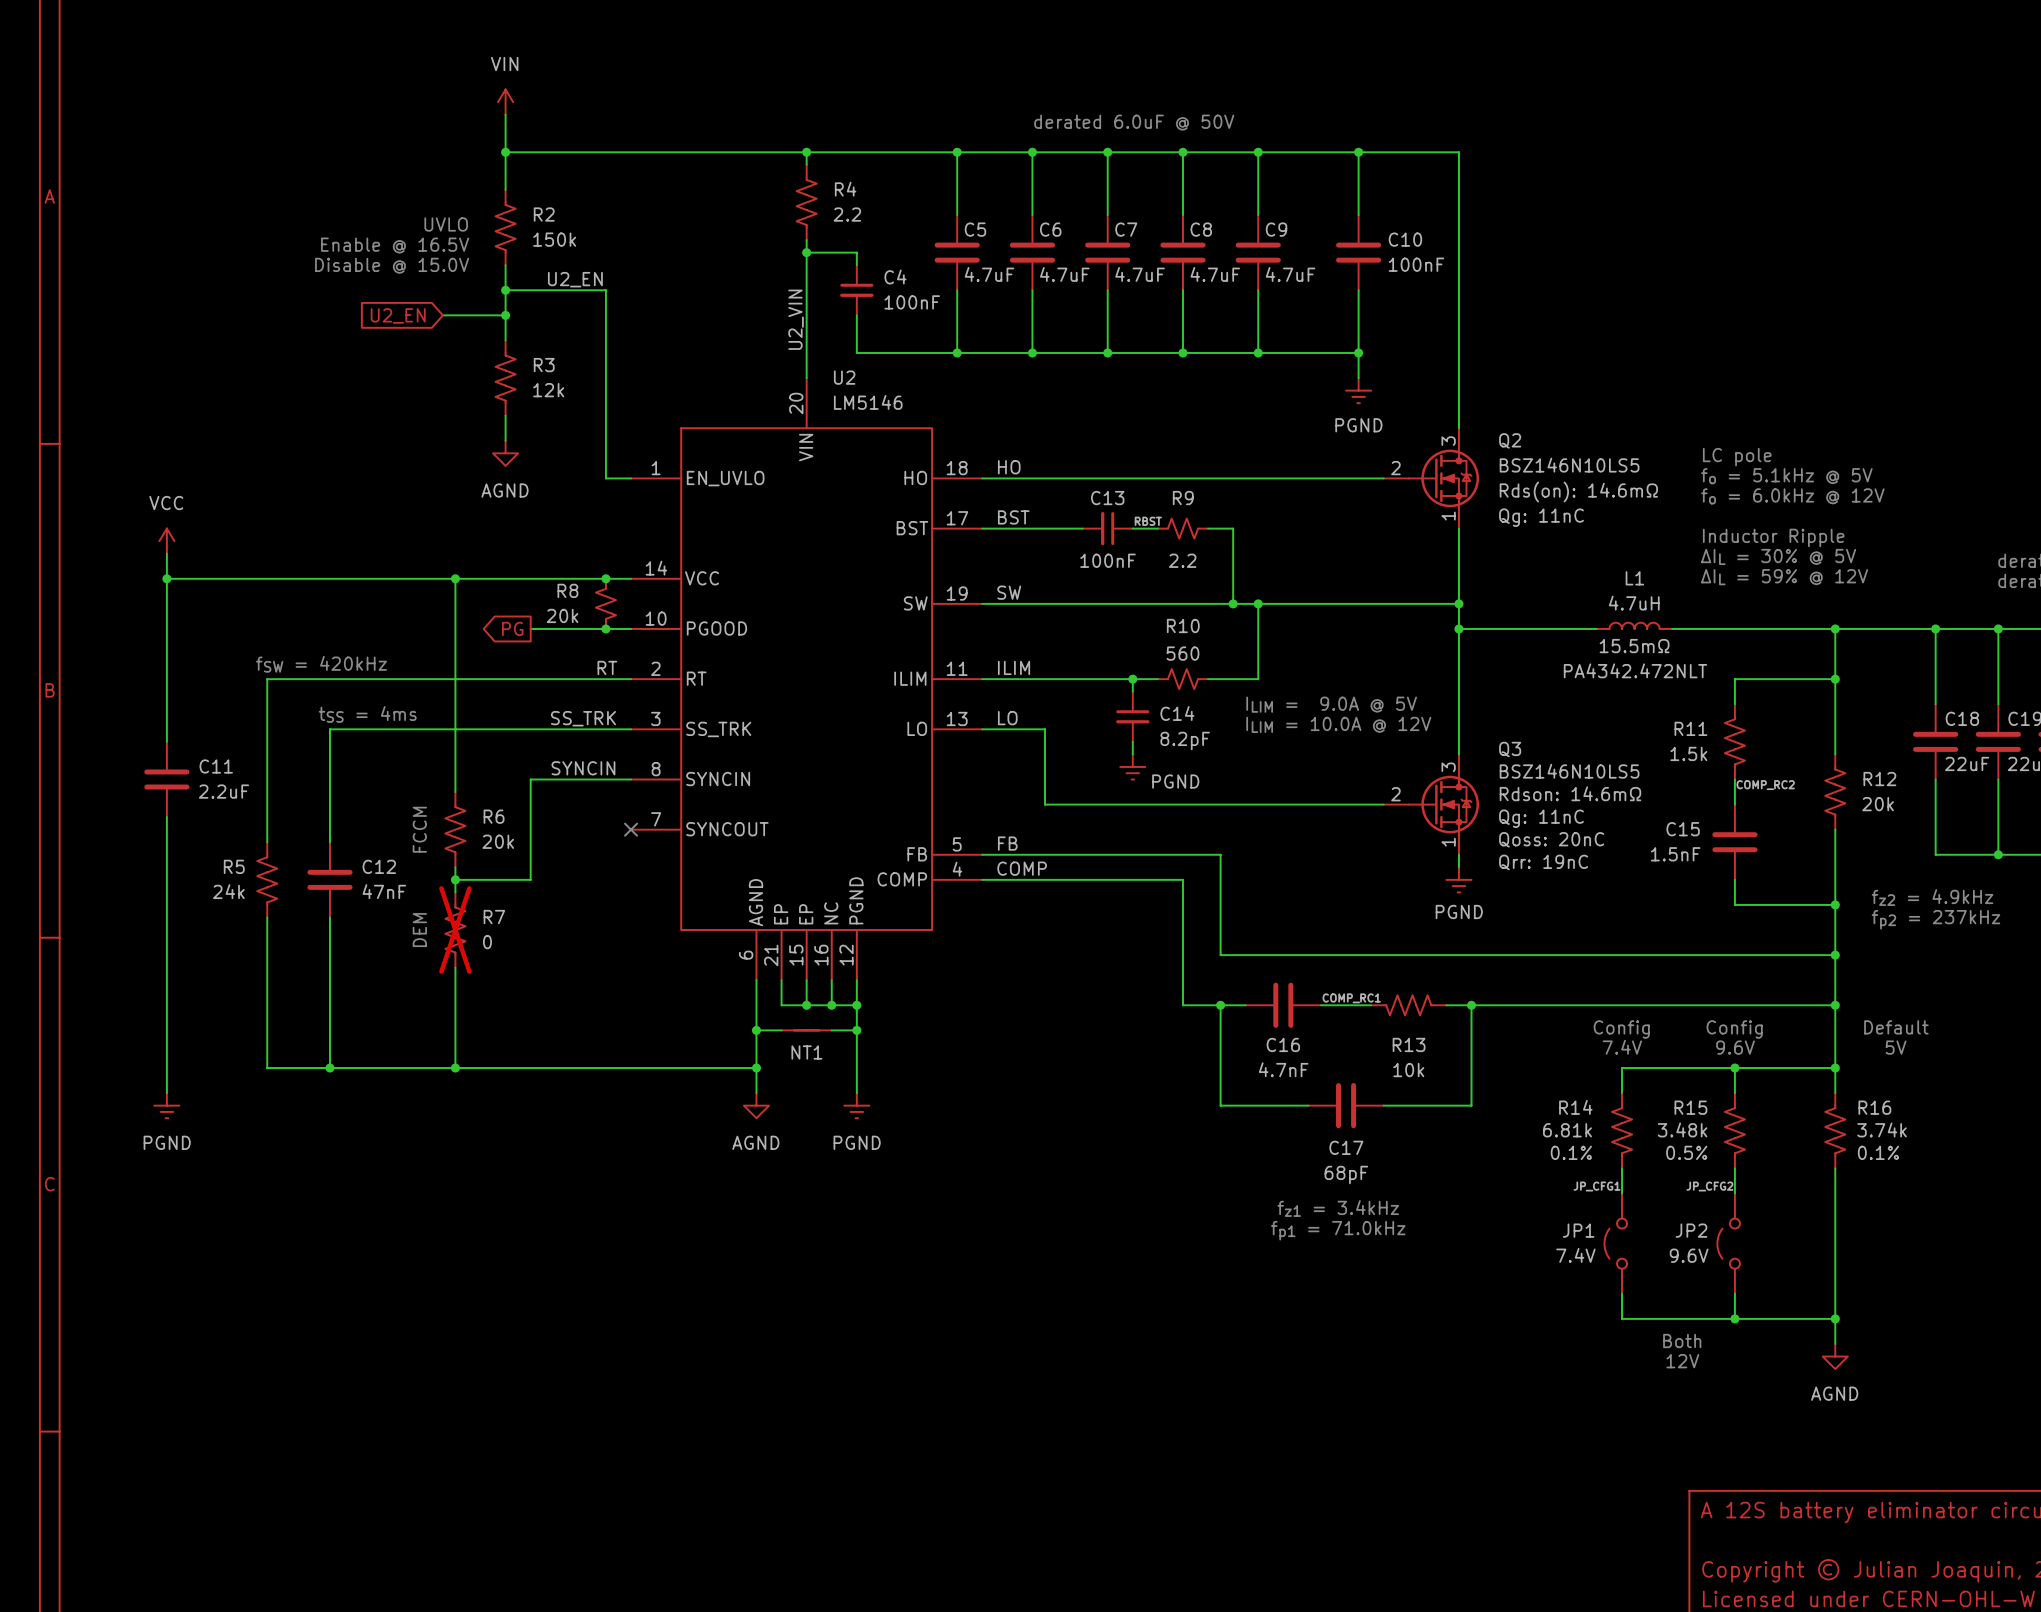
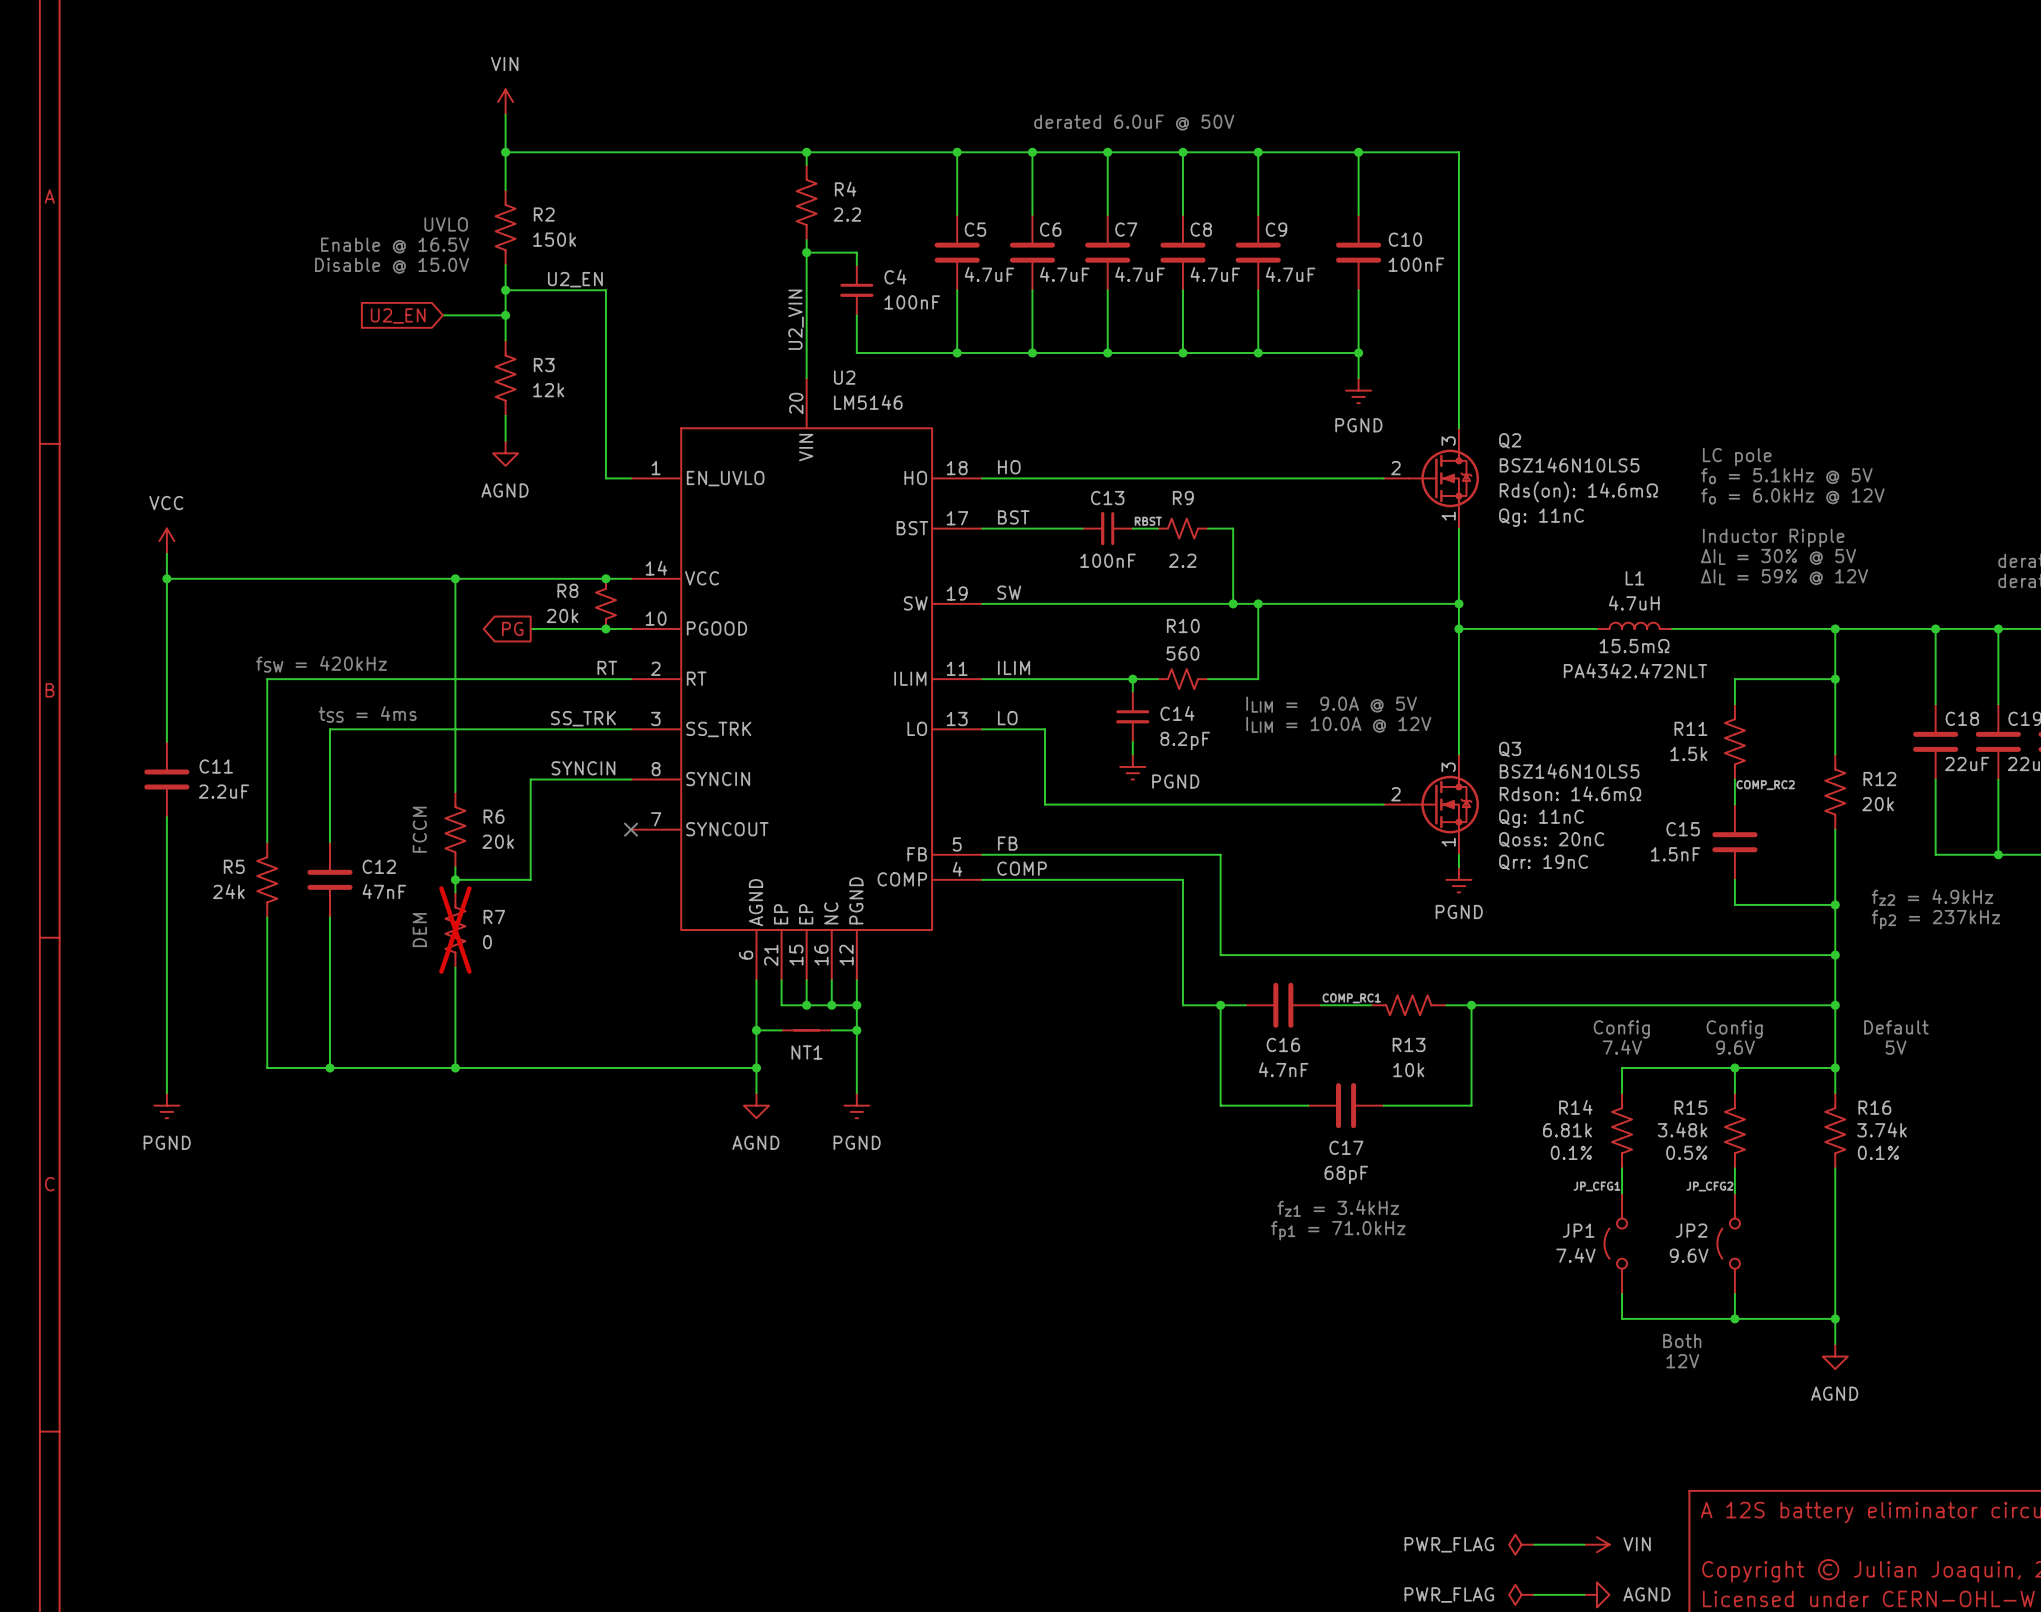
power symbol: none -> PWR_FLAG (1521, 1544)
wire: none -> (1534, 1544) (1584, 1544)
power symbol: none -> VIN (1596, 1544)
power symbol: none -> PWR_FLAG (1521, 1594)
wire: none -> (1534, 1594) (1584, 1594)
power symbol: none -> AGND (1596, 1594)

